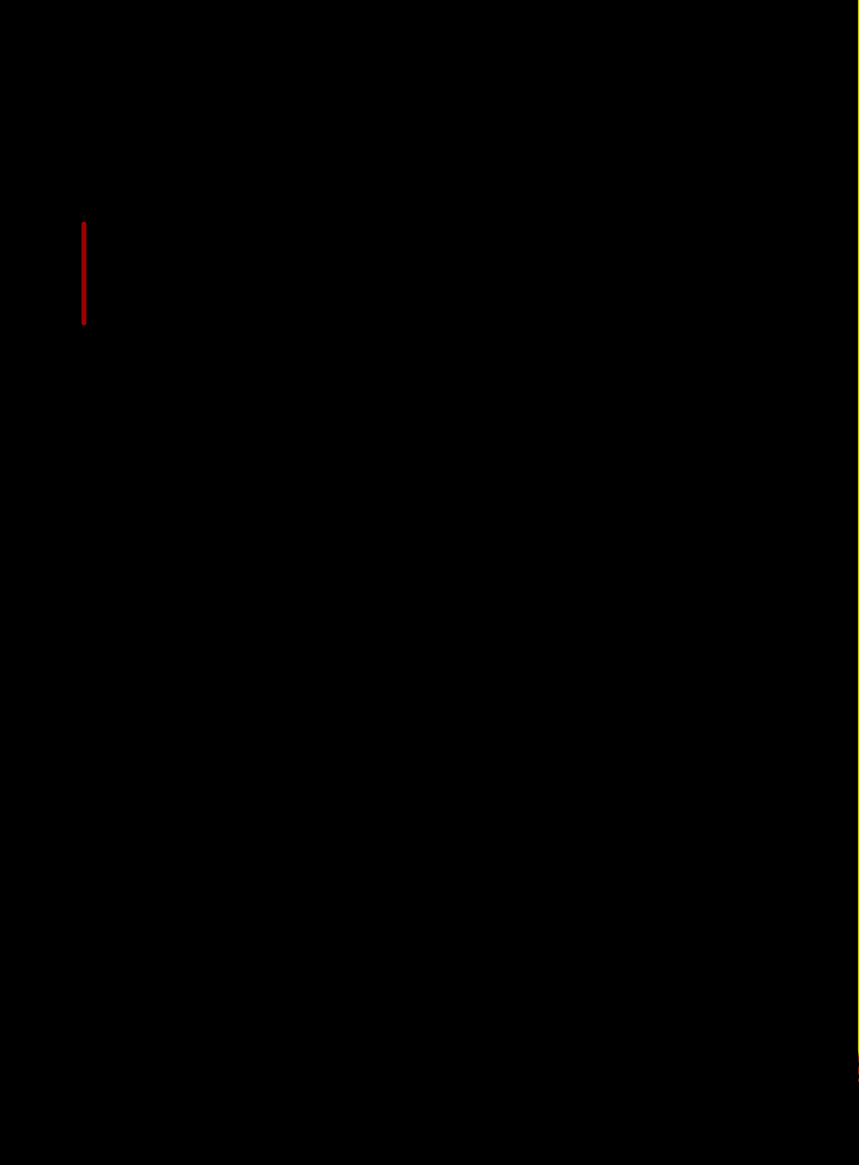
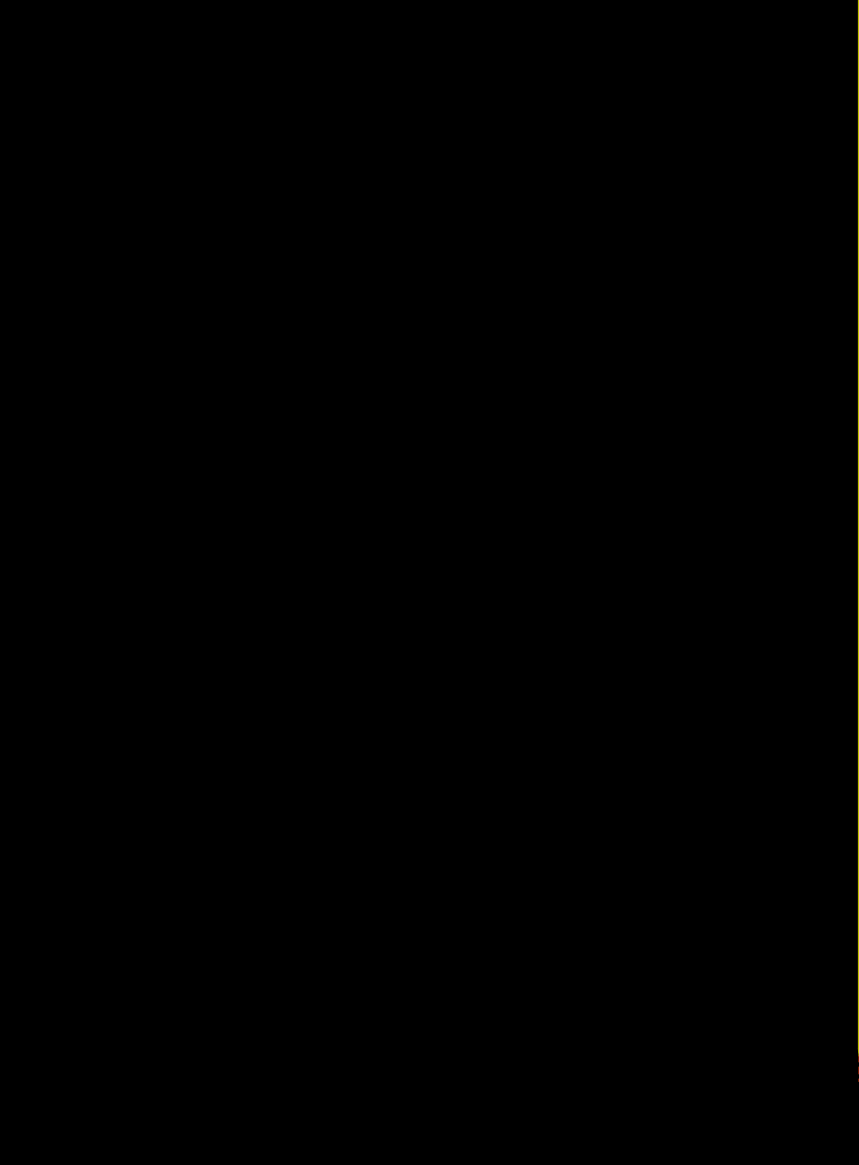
top track: (83, 224) (83, 323) -> none

